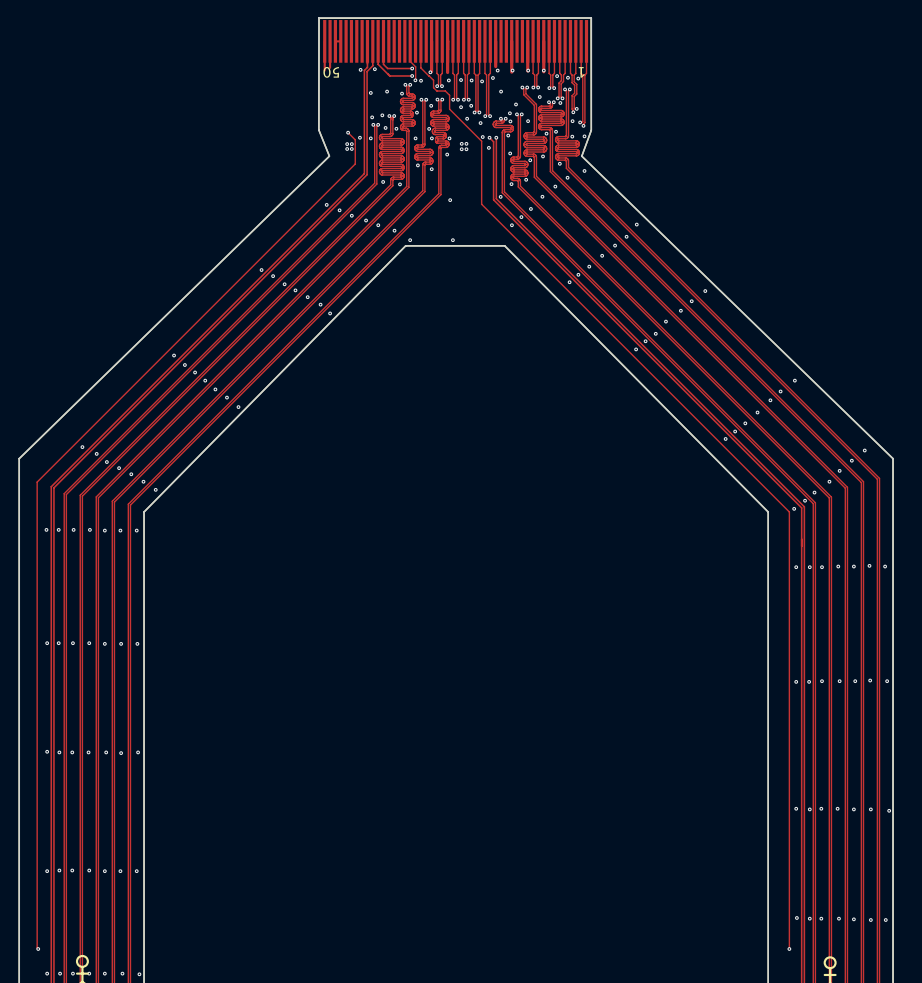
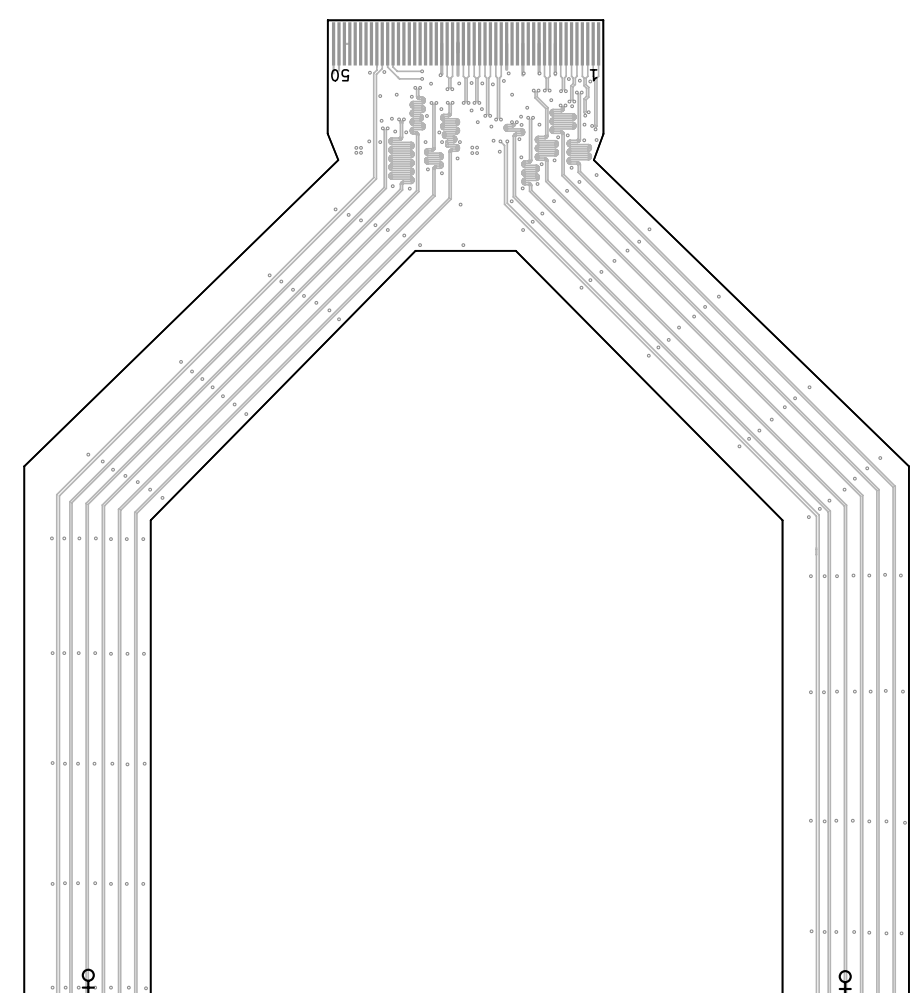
track: (410, 41) (410, 61) (415, 66) (415, 80) -> none
track: (420, 41) (420, 67) (433, 80) (433, 87) (436, 91) (445, 91) (449, 95) (449, 109) (481, 141) (481, 204) (789, 511) (789, 949) -> none
via: (415, 80) -> none
track: (348, 132) (355, 139) (355, 163) (37, 482) (38, 949) -> none
via: (348, 132) -> none
via: (38, 949) -> none
via: (789, 949) -> none

